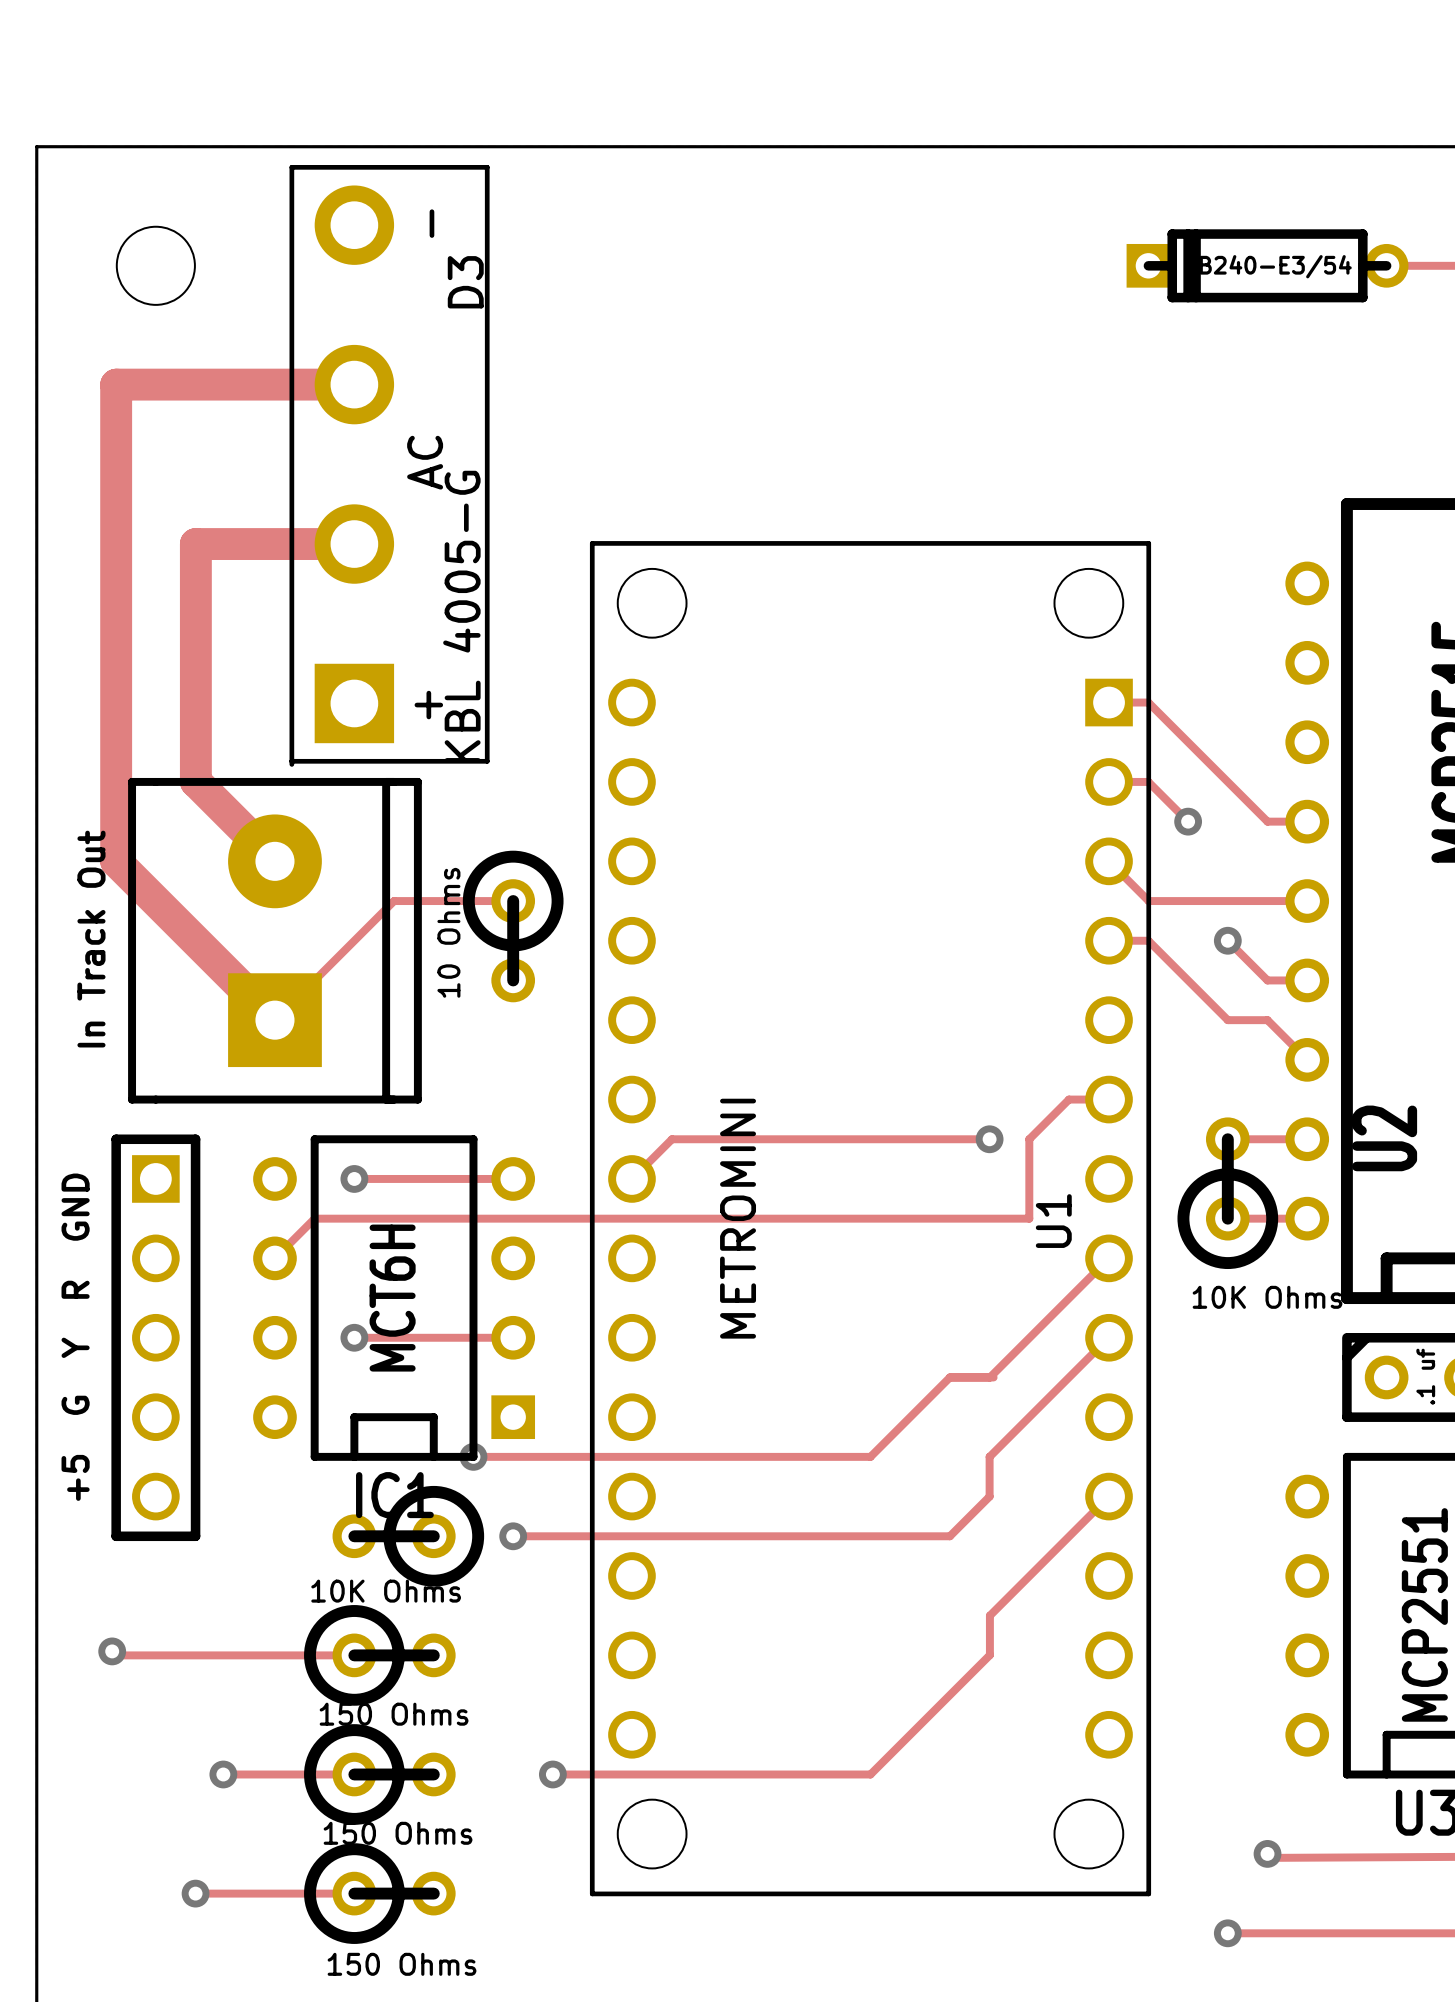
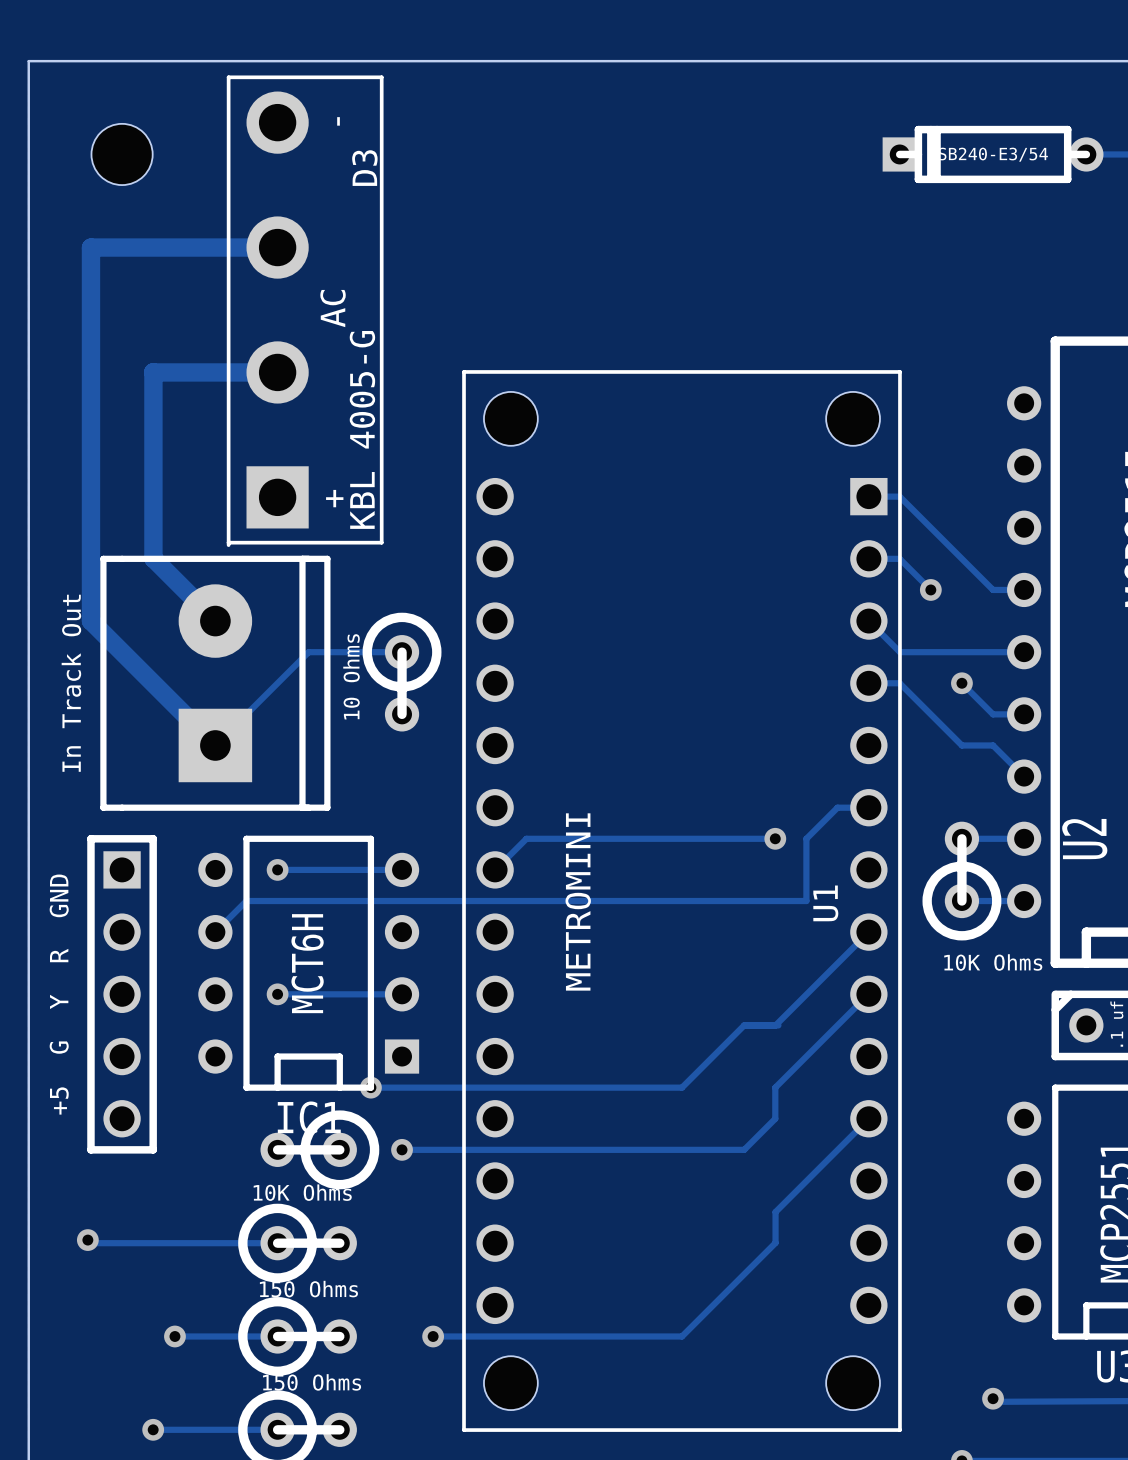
track width: thick (116, 384) (354, 384) -> thin (91, 247) (277, 247)
track width: thick (116, 384) (116, 861) (274, 1020) -> thin (90, 247) (90, 621) (215, 745)
track width: thick (354, 544) (195, 544) (195, 781) (274, 861) -> thin (277, 372) (153, 372) (153, 558) (215, 621)

